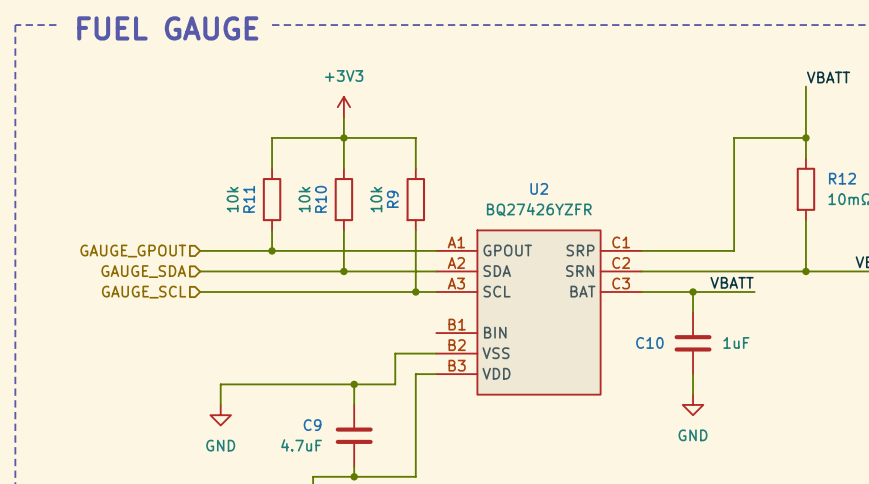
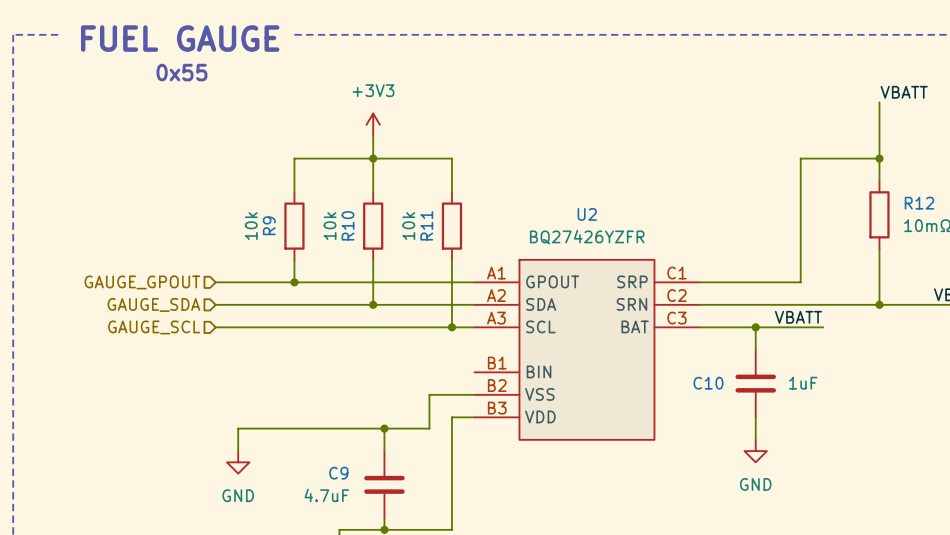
text: none -> 0x55 (181, 72)
R11 name: R11 (249, 199) -> R9 (269, 225)
R9 name: R9 (392, 199) -> R11 (426, 225)

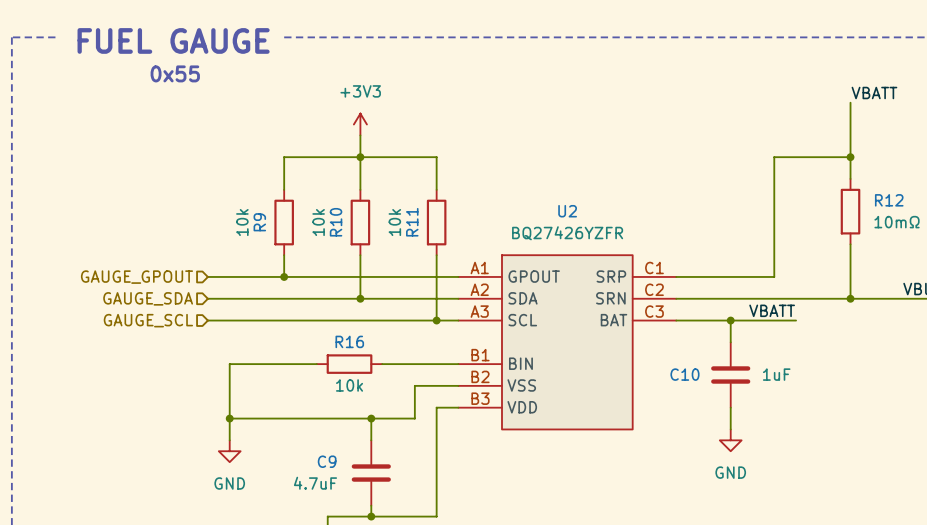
wire: none -> (316, 364) (229, 364) (229, 418)
R16: none -> 10k (349, 364)
wire: none -> (382, 364) (458, 364)
junction: none -> (229, 418)

